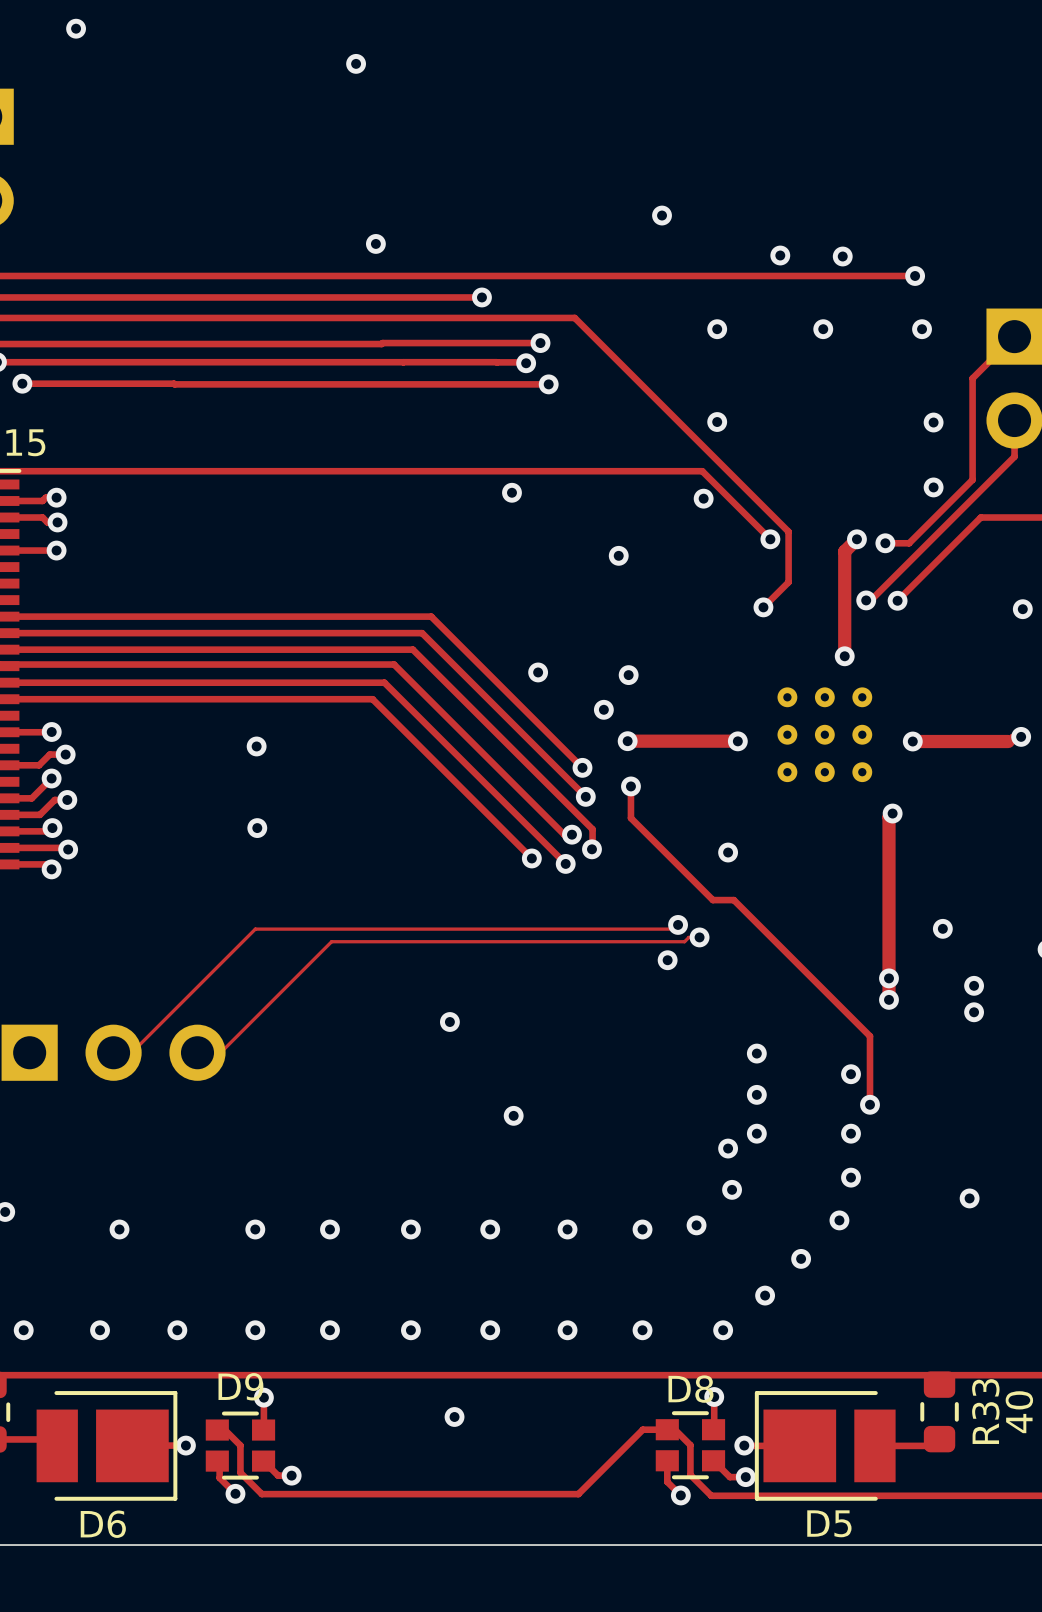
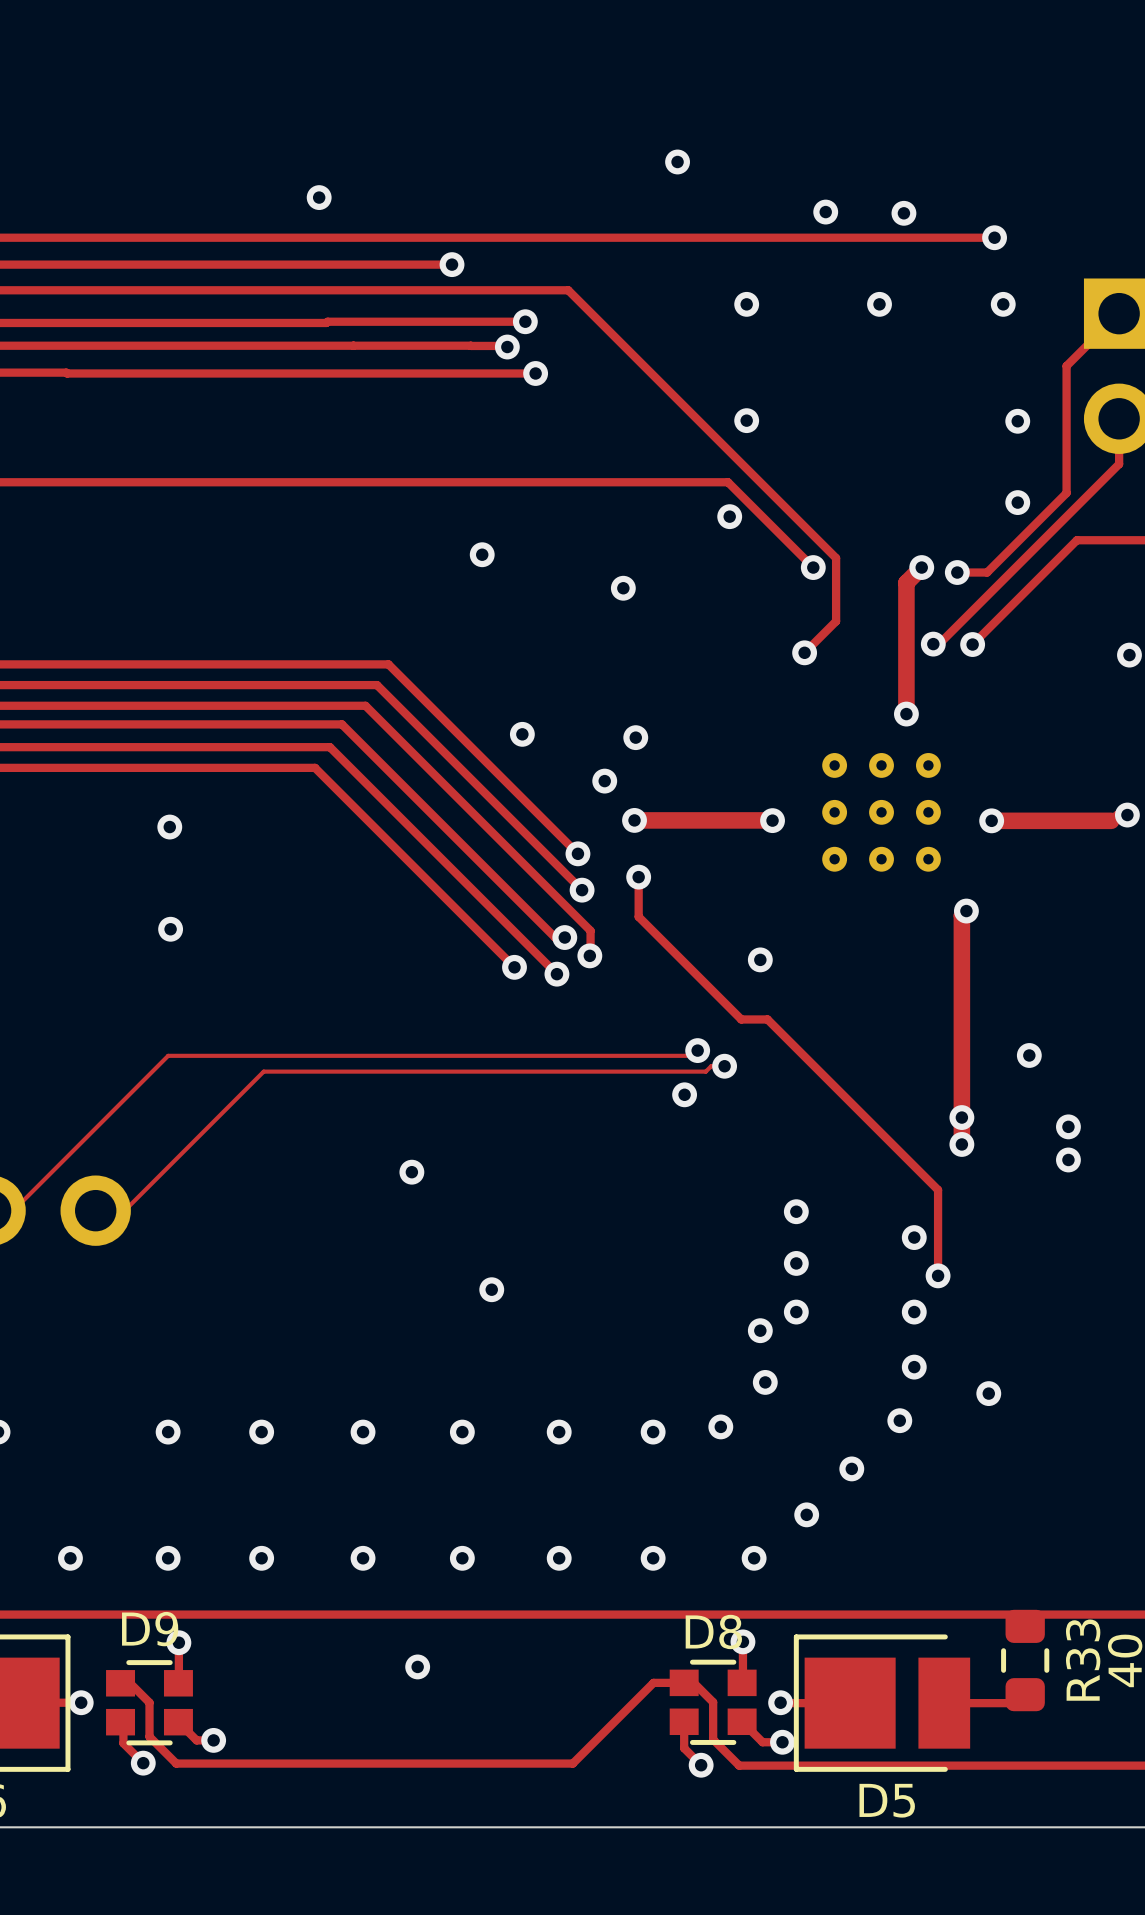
via position: (511, 492) -> (482, 554)
via position: (969, 1198) -> (988, 1393)

